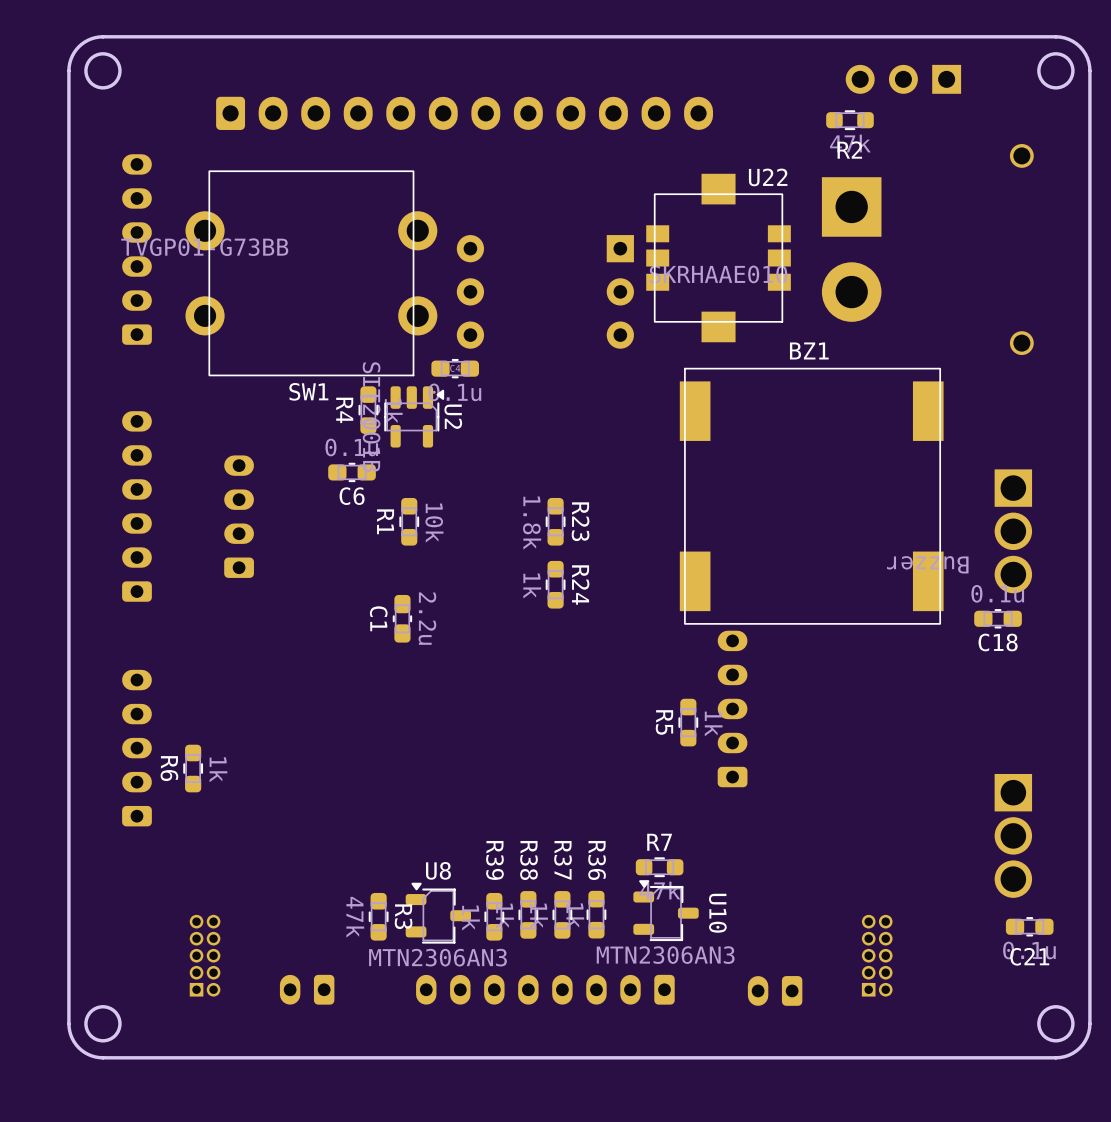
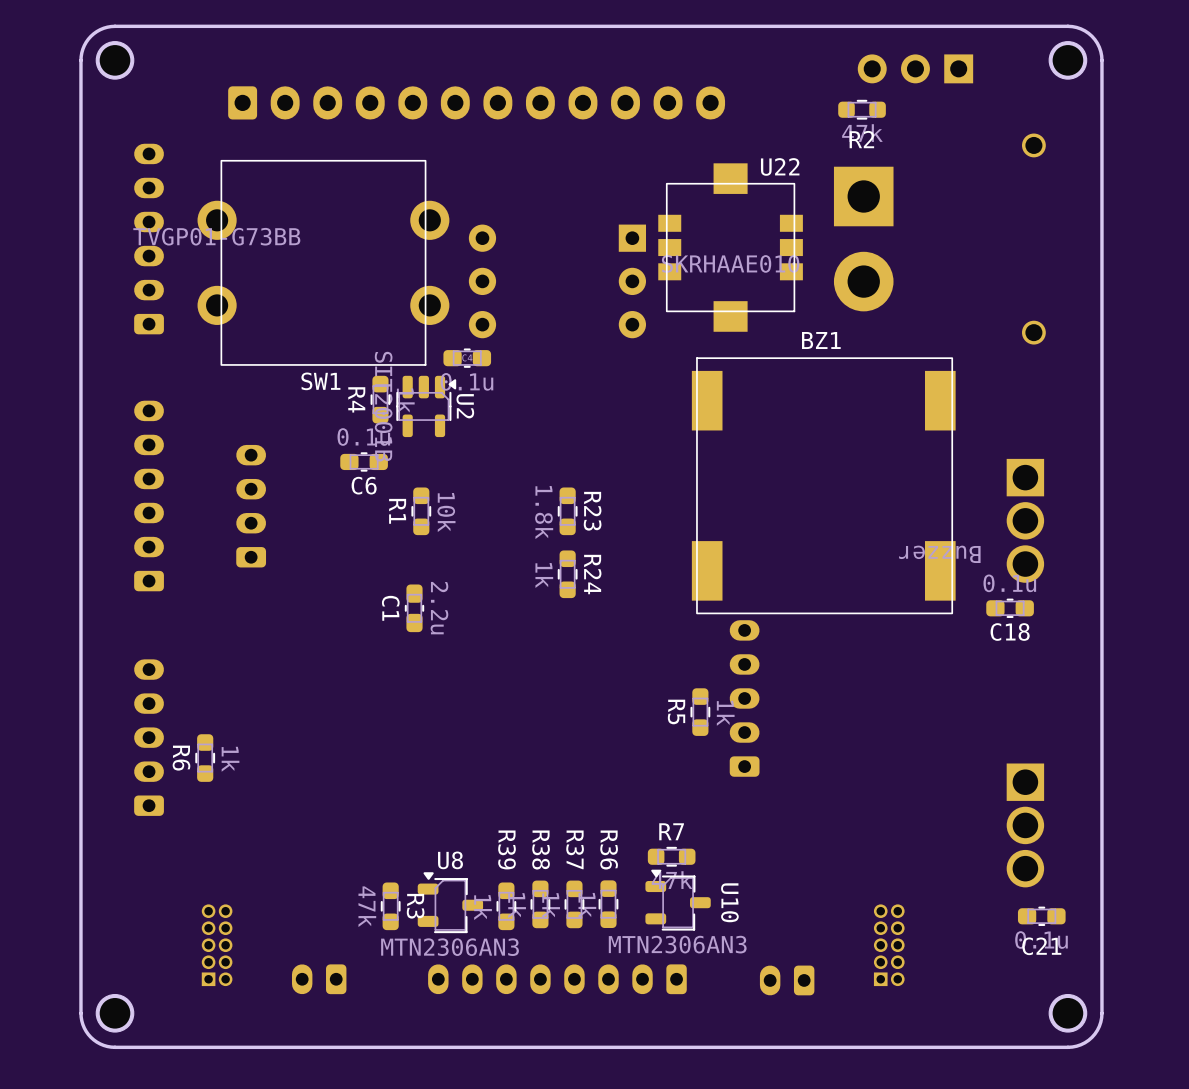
part: none -> (115, 60)
part: none -> (1067, 60)
part: none -> (115, 1013)
part: none -> (1067, 1013)

